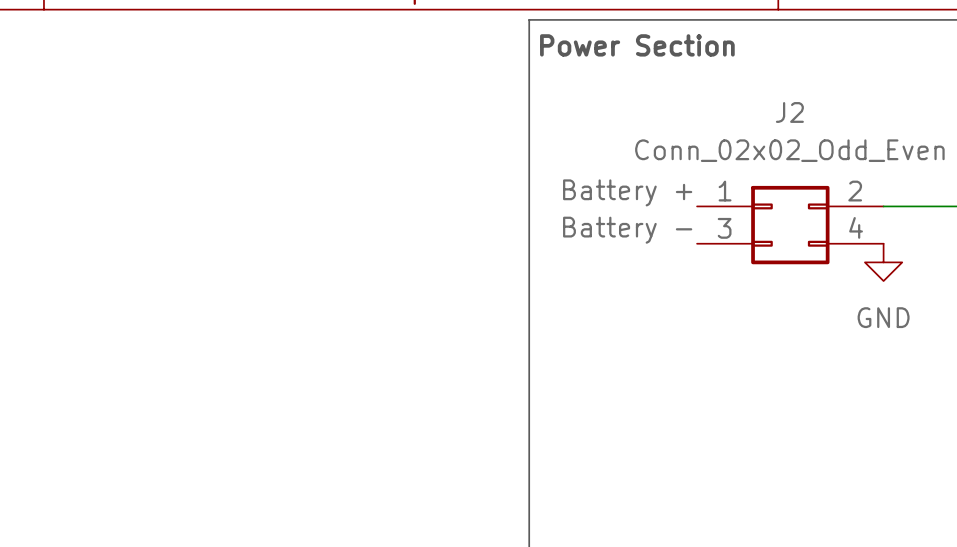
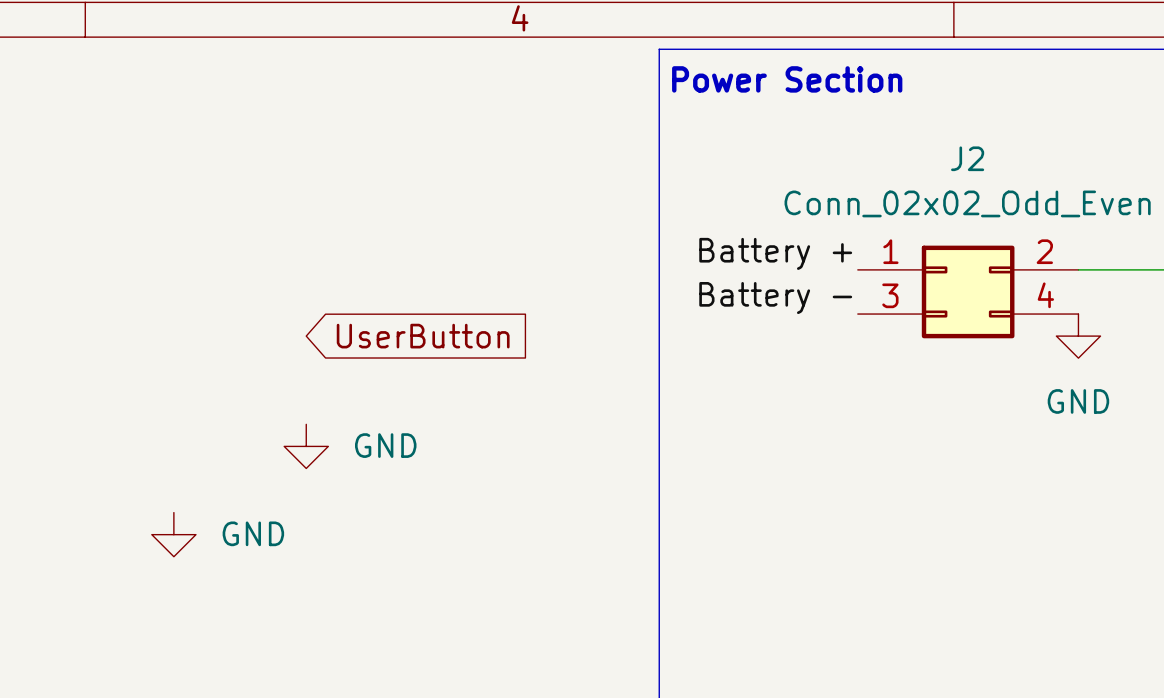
global label: none -> UserButton (423, 336)
power symbol: none -> GND (306, 446)
power symbol: none -> GND (173, 534)

